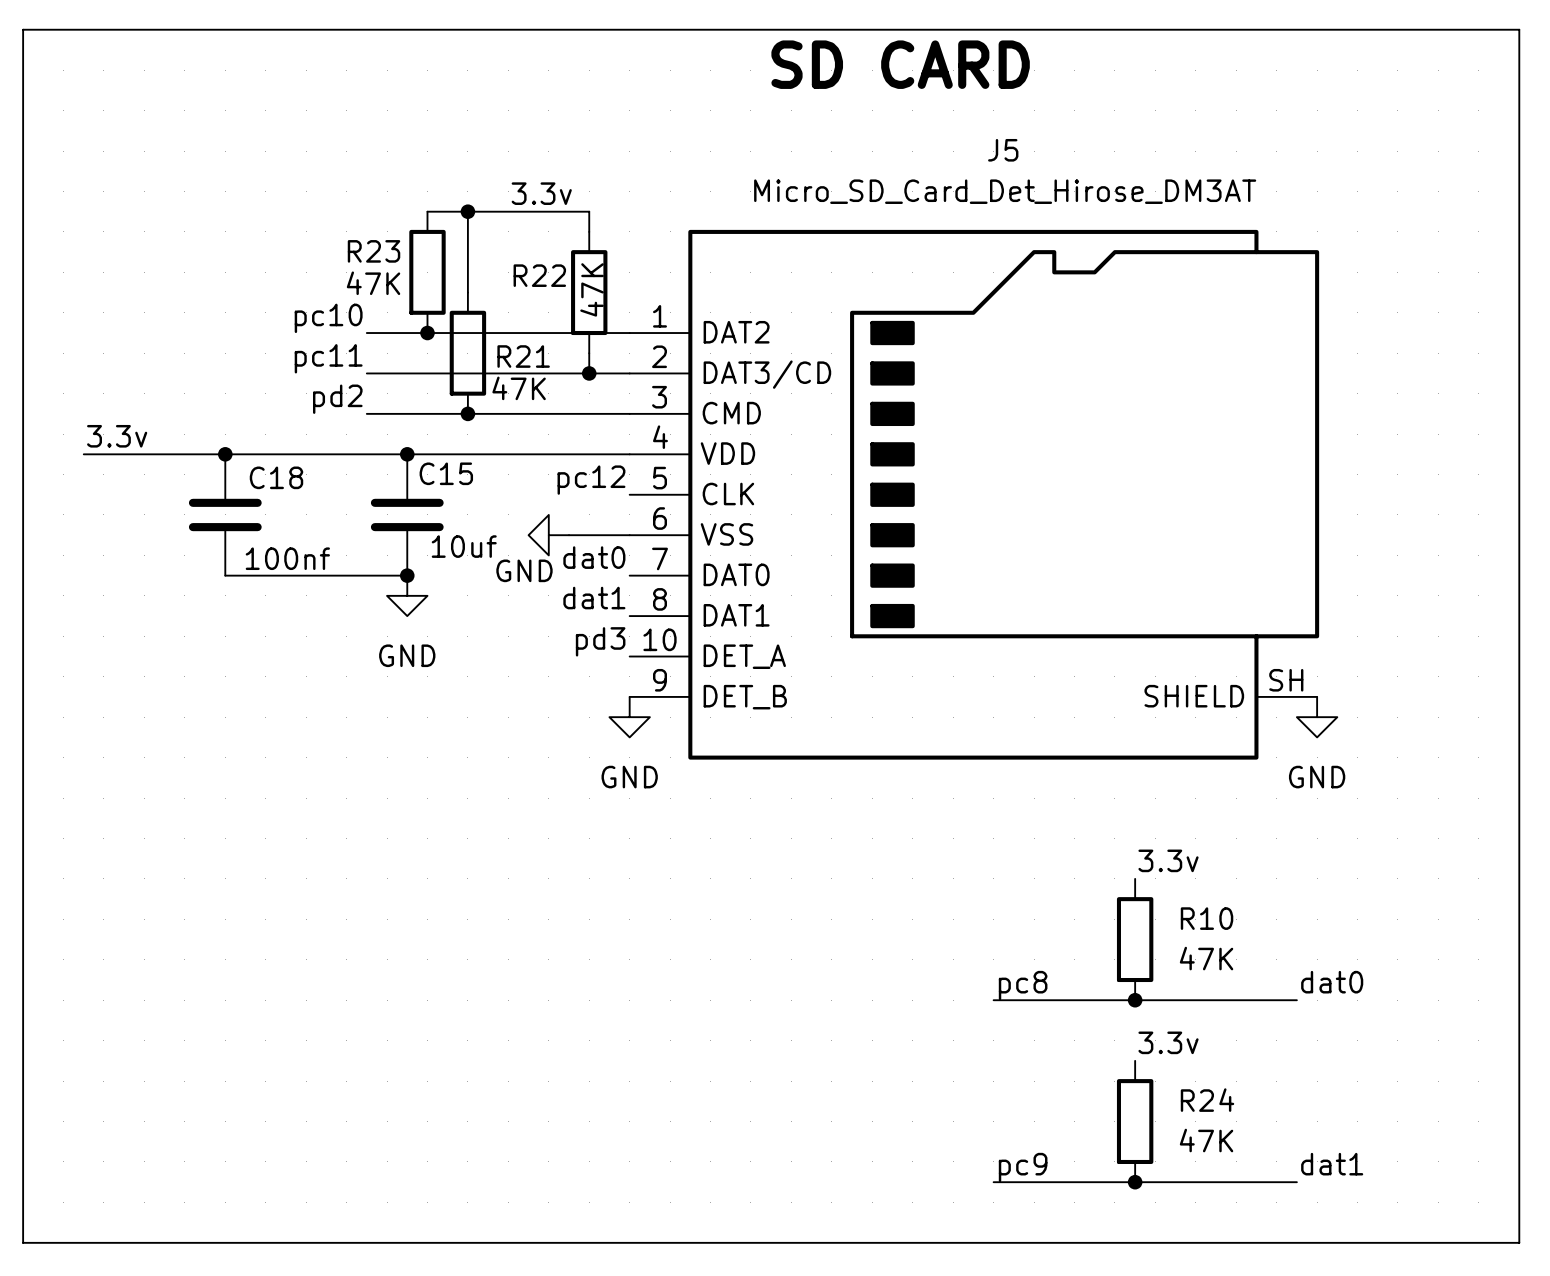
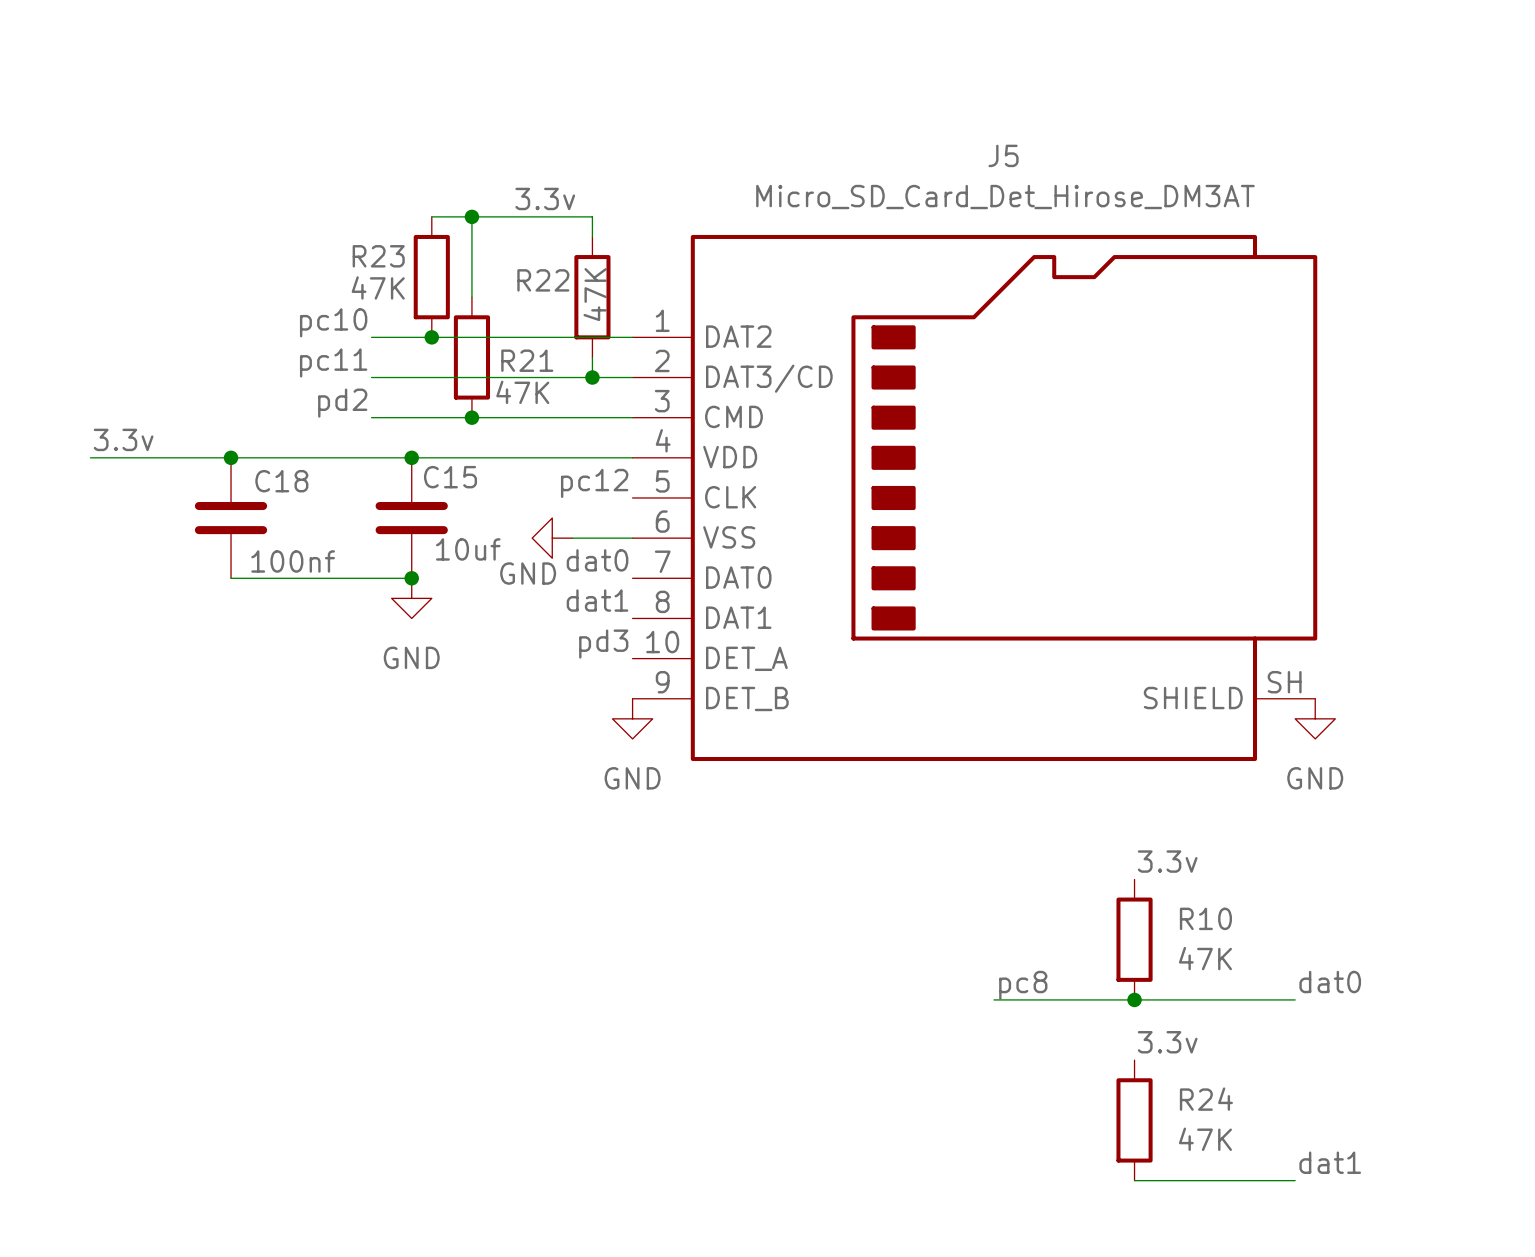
line: (23, 29) (1519, 29) (1519, 1242) (23, 1242) (23, 29) -> none
text: SD CARD (900, 64) -> none
label: pc9 (1023, 1167) -> none
wire: (993, 1182) (1135, 1182) -> none
junction: (1135, 1182) -> none

